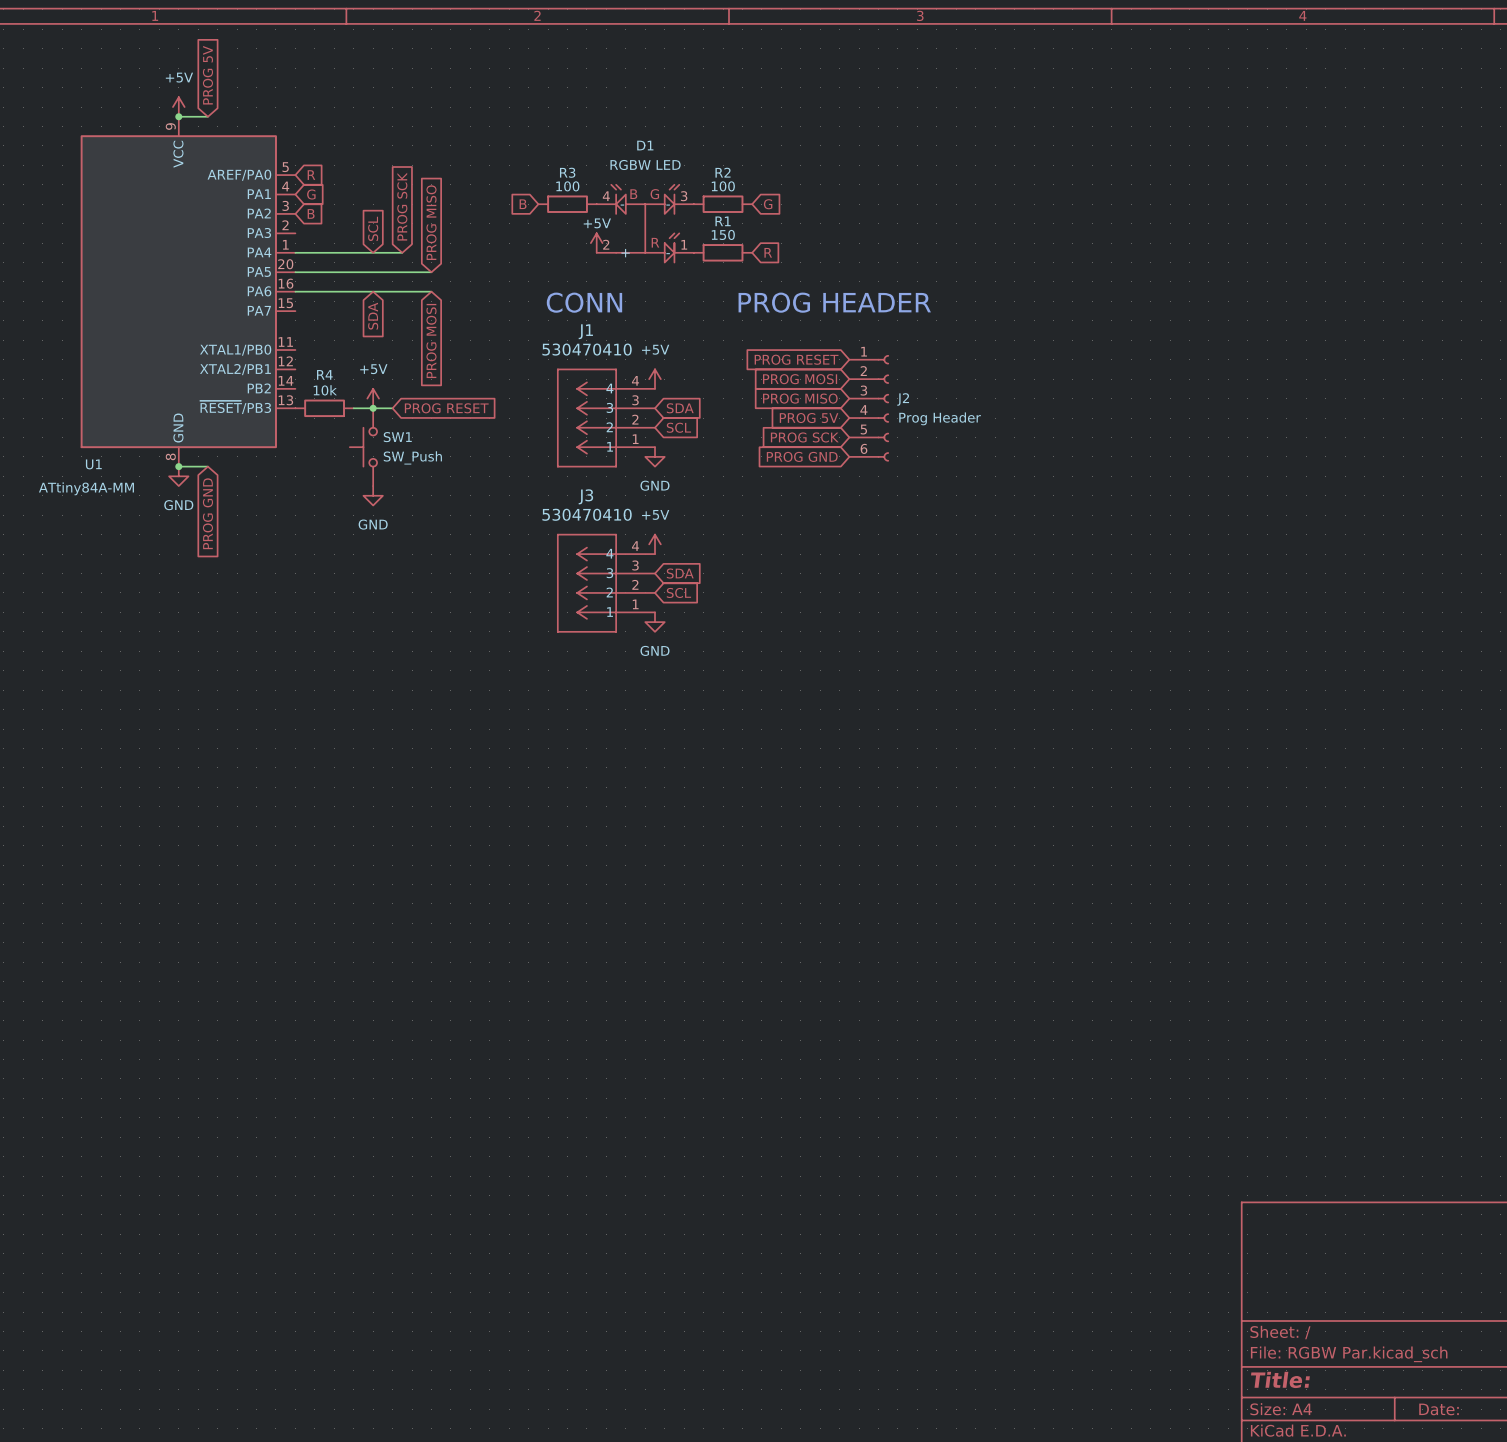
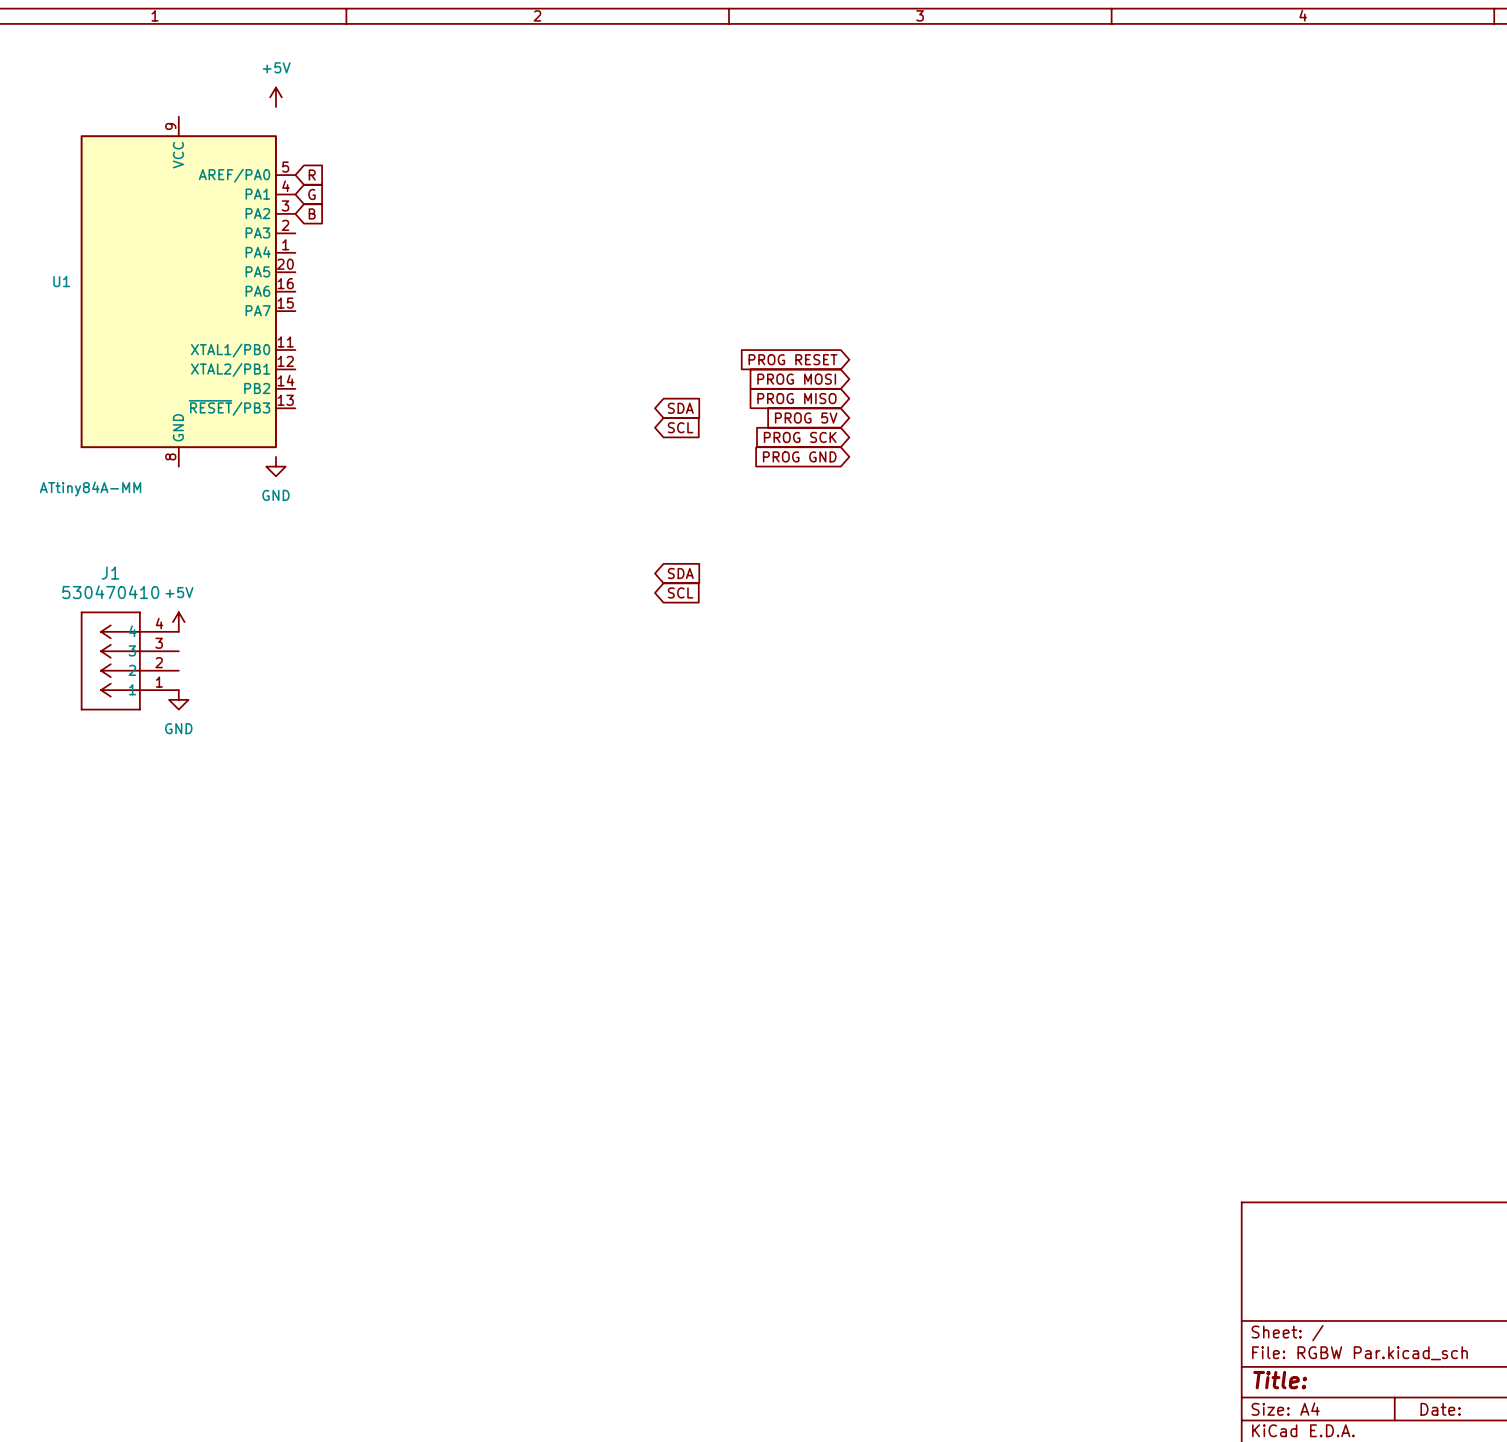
global label: PROG 5V (207, 75) -> none
power symbol position: +5V (178, 107) -> +5V (275, 97)
wire: (178, 116) (207, 116) -> none
junction: (178, 116) -> none
global label: B (523, 204) -> none
R3: 100 (567, 204) -> none
R2: 100 (723, 204) -> none
global label: G (768, 204) -> none
global label: PROG SCK (402, 206) -> none
global label: PROG MISO (431, 222) -> none
D1: RGBW LED (645, 223) -> none
global label: SCL (373, 228) -> none
power symbol: +5V (596, 243) -> none
wire: (295, 252) (402, 252) -> none
R1: 150 (723, 252) -> none
global label: R (768, 252) -> none
wire: (295, 272) (431, 272) -> none
wire: (295, 291) (431, 291) -> none
text: CONN (584, 302) -> none
text: PROG HEADER (834, 302) -> none
global label: SDA (373, 316) -> none
global label: PROG MOSI (431, 340) -> none
power symbol: +5V (655, 379) -> none
power symbol: +5V (373, 398) -> none
R4: 10k (324, 408) -> none
wire: (353, 408) (392, 408) -> none
junction: (373, 408) -> none
global label: PROG RESET (446, 408) -> none
J2: Prog Header (869, 408) -> none
J1 position: (606, 418) -> (129, 660)
SW1: SW_Push (363, 447) -> none
power symbol: GND (655, 456) -> none
U1 name position: U1 (93, 464) -> U1 (61, 281)
wire: (178, 466) (207, 466) -> none
junction: (178, 466) -> none
power symbol: none -> GND (275, 466)
power symbol: GND (178, 476) -> none
power symbol: GND (373, 495) -> none
global label: PROG GND (207, 513) -> none
power symbol: +5V (655, 544) -> none
J3: 530470410 (606, 583) -> none
power symbol: none -> +5V (178, 622)
power symbol: GND (655, 622) -> none
power symbol: none -> GND (178, 699)

